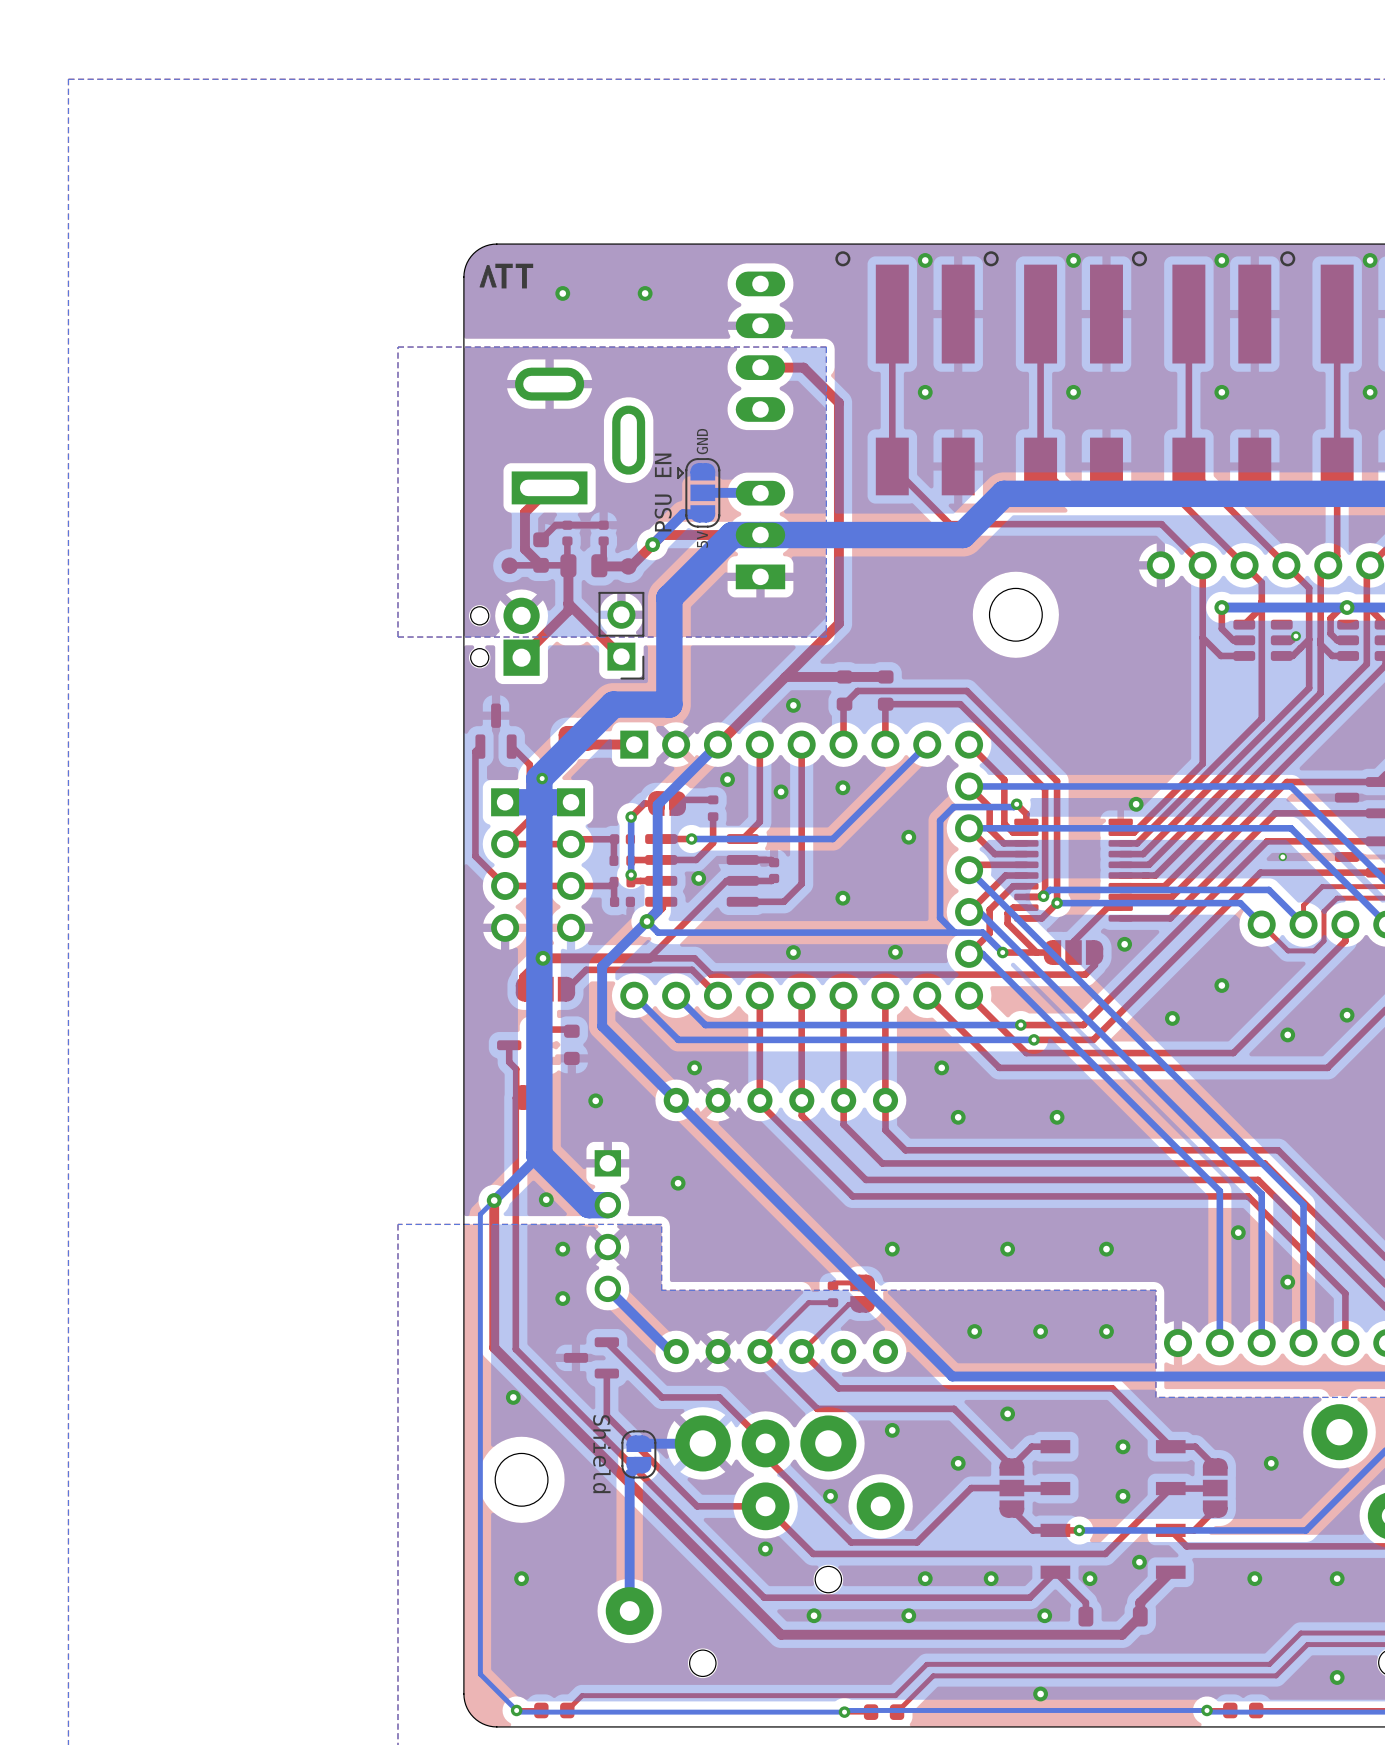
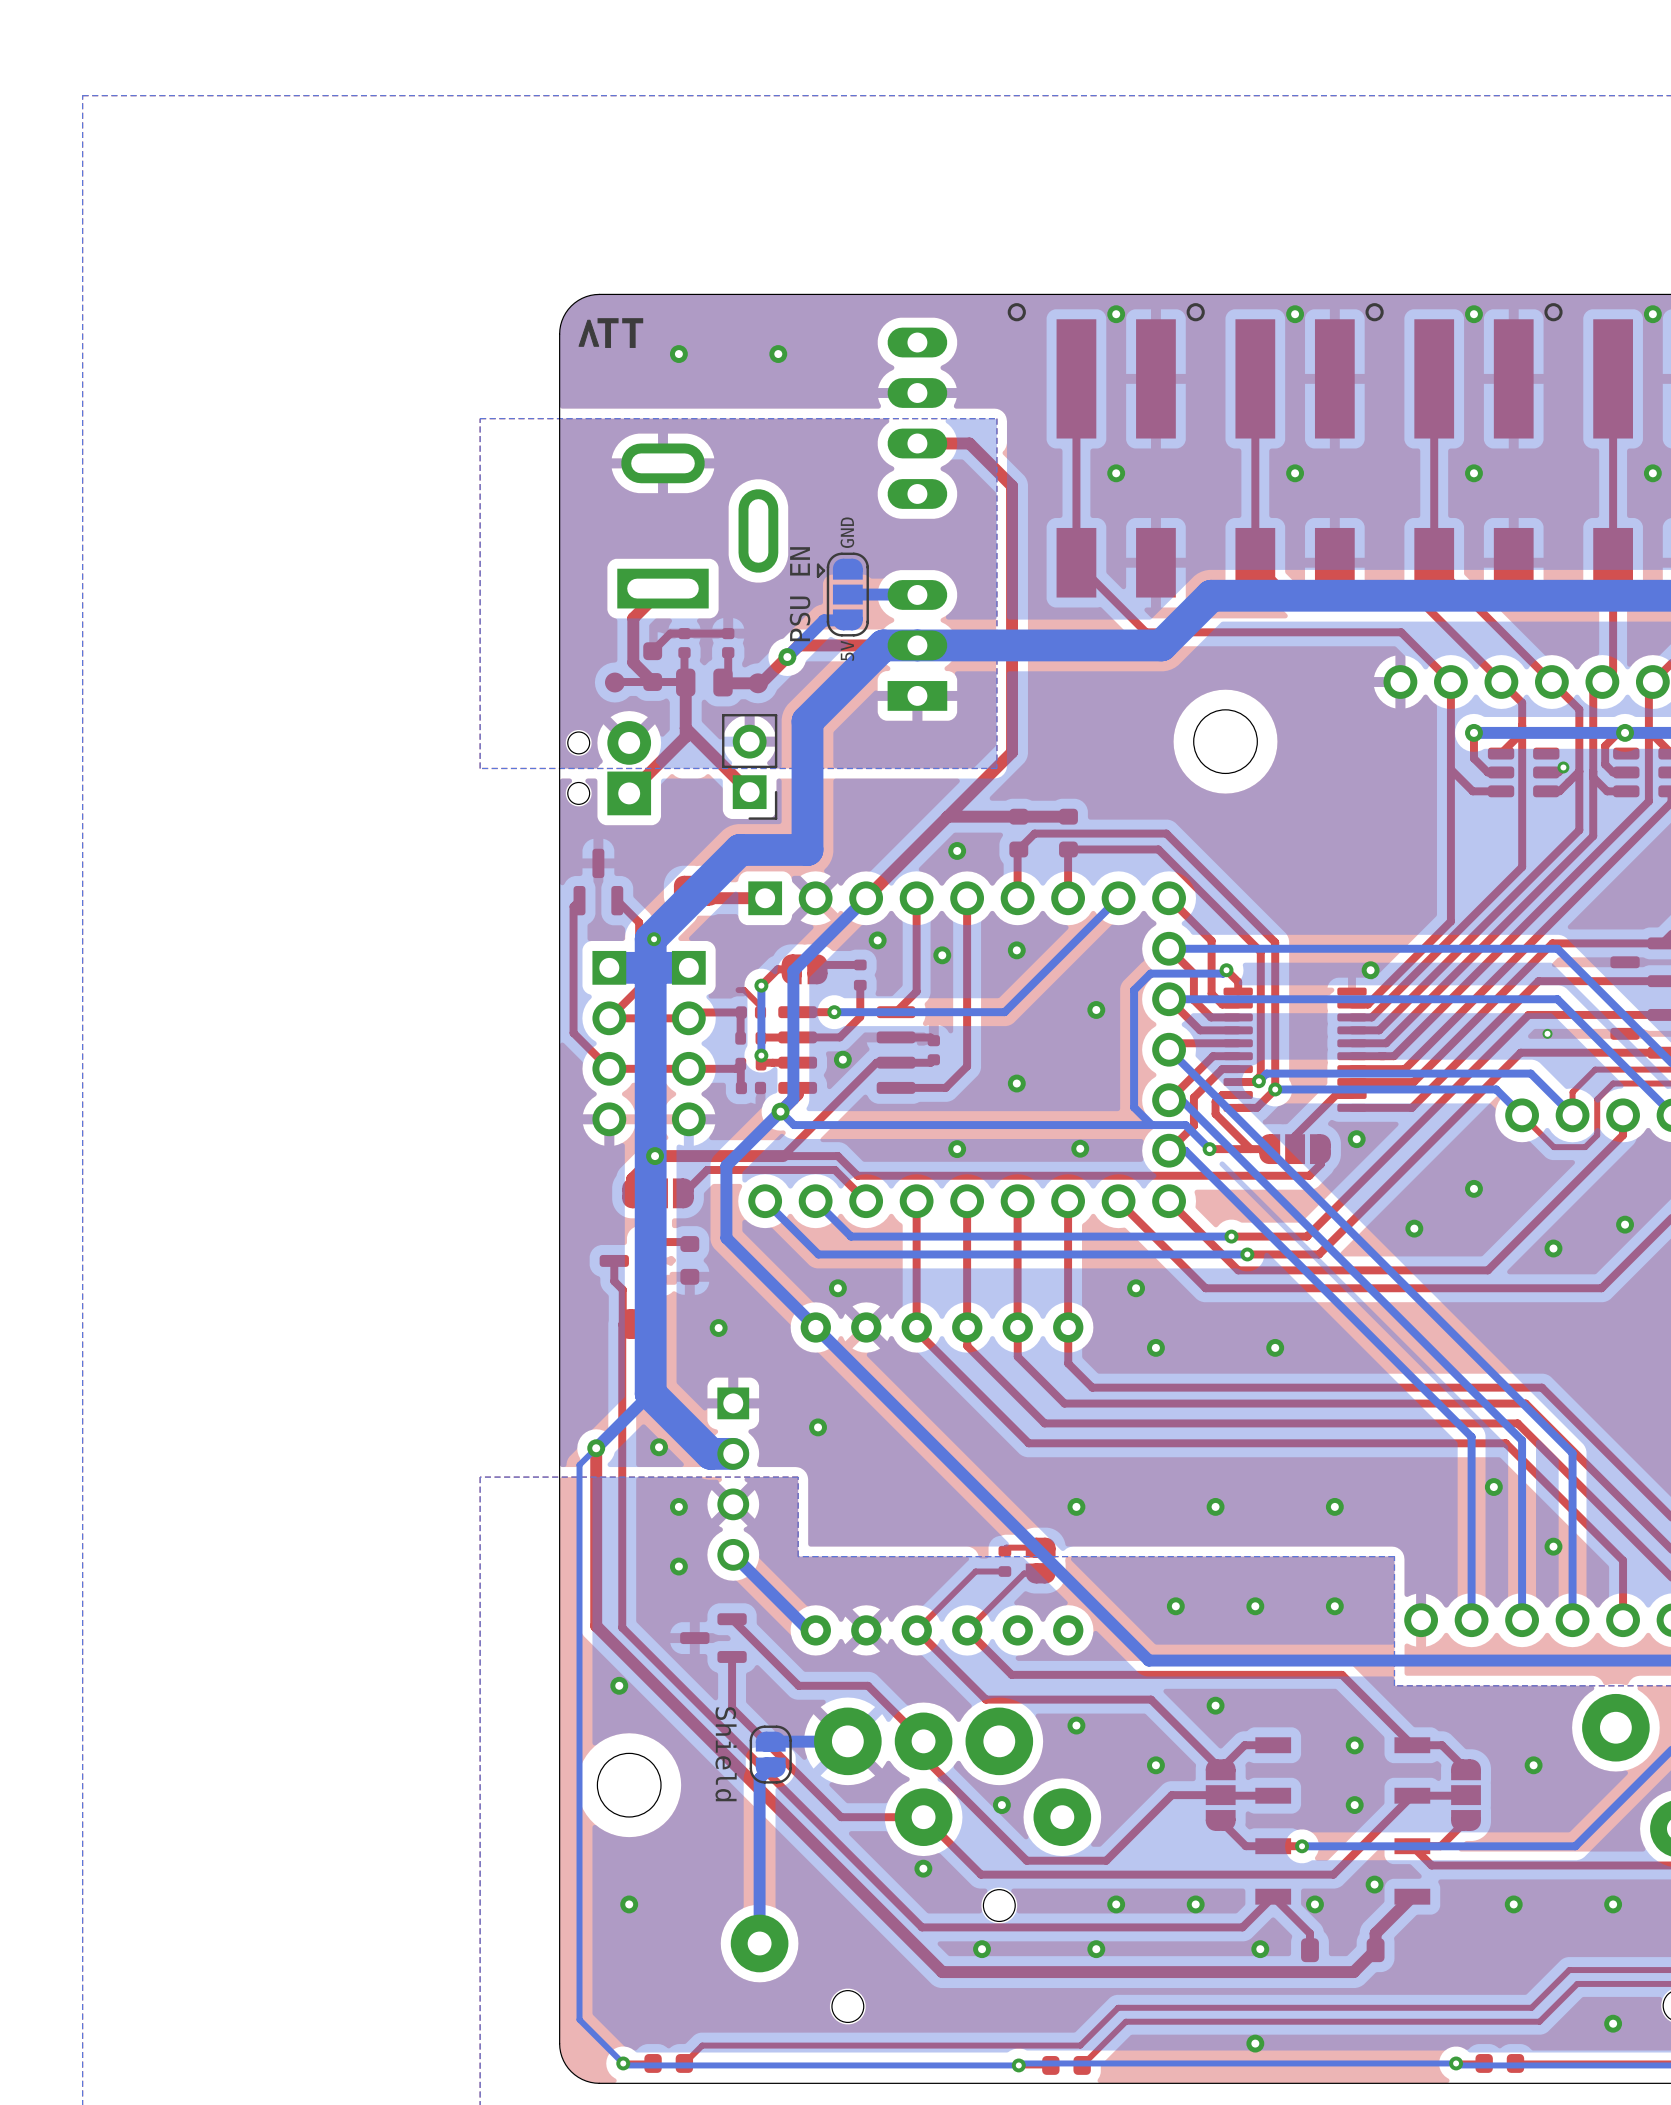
top track: none -> (738, 990) (744, 990) (760, 1006) (760, 1012)

